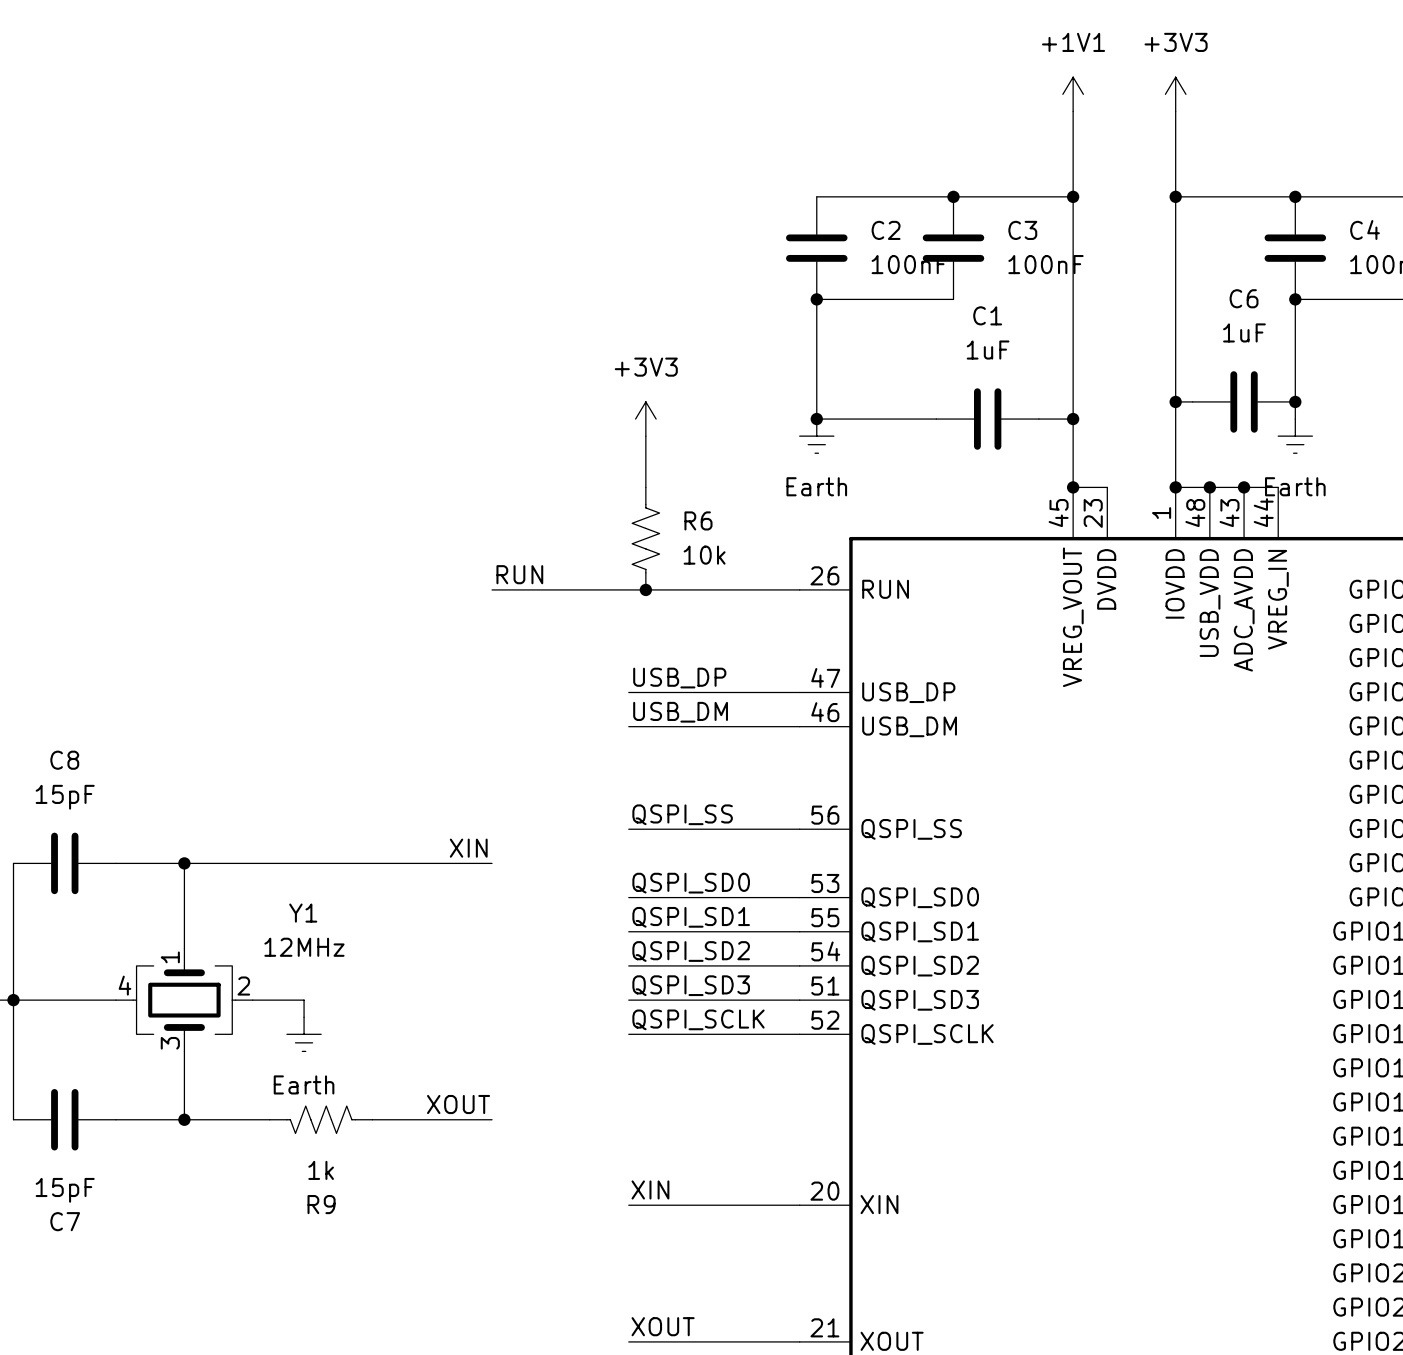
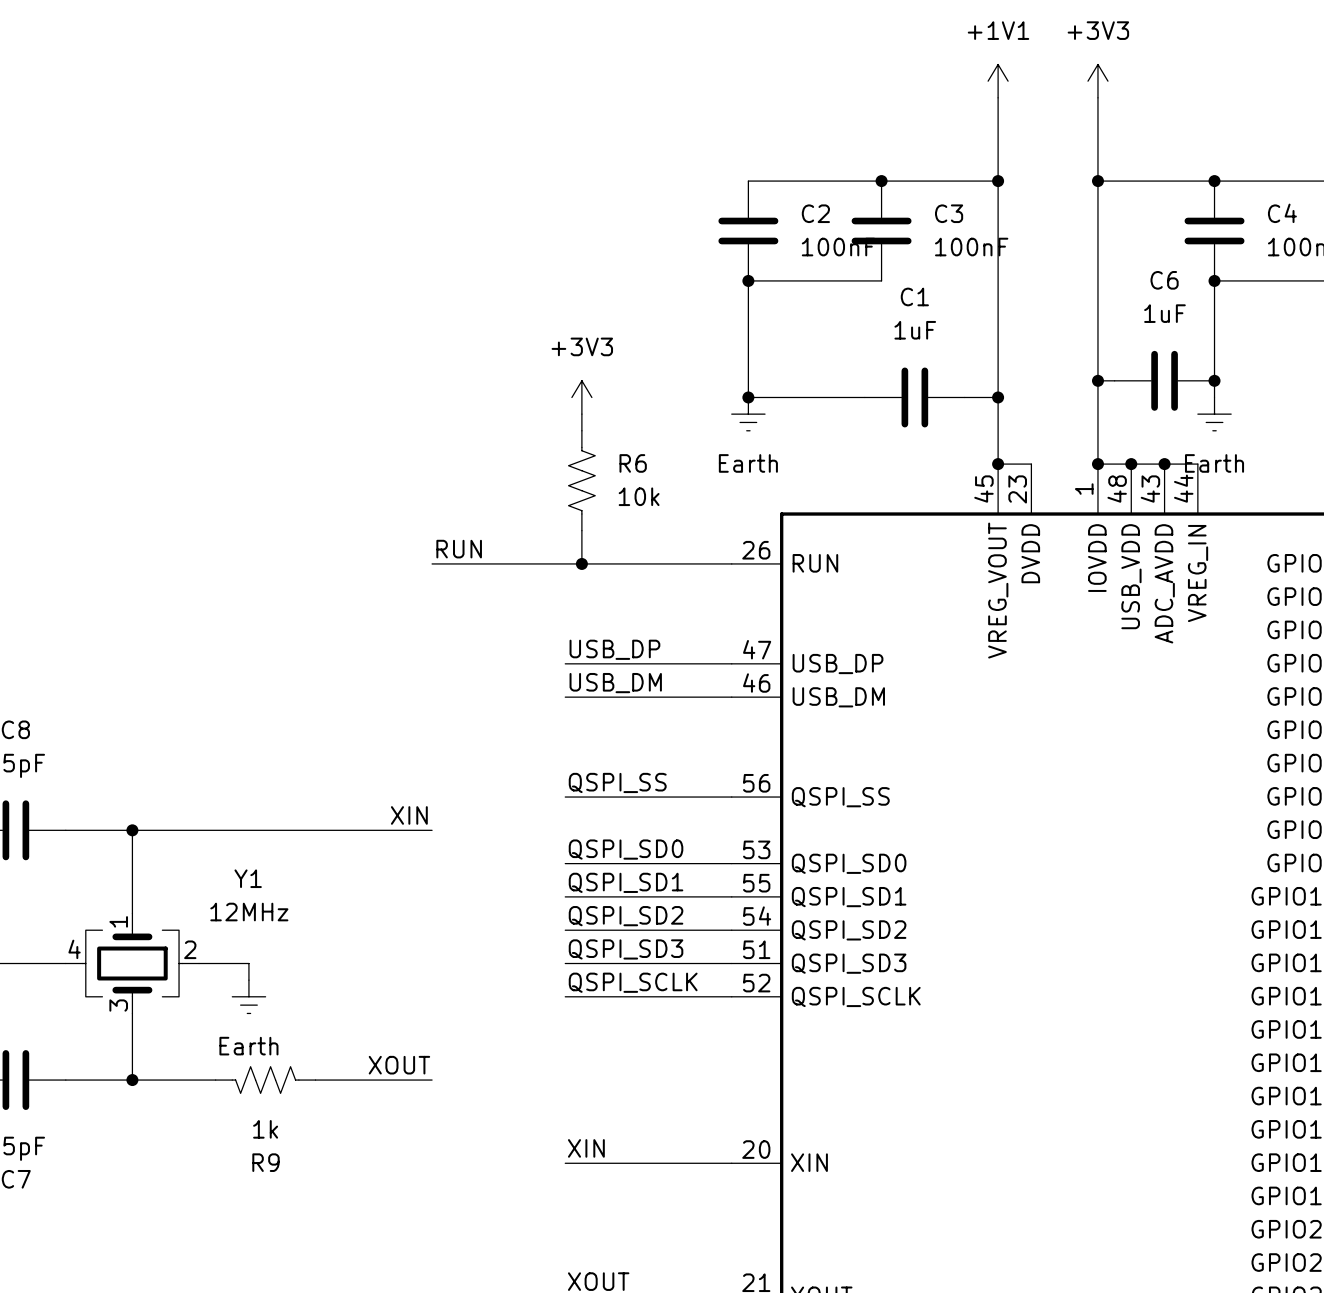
R6 position: (645, 538) -> (581, 480)

